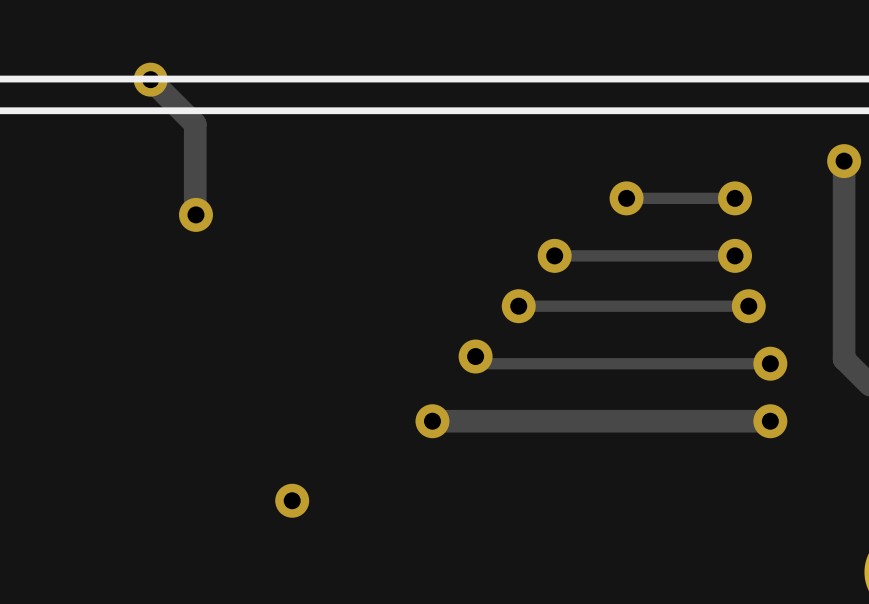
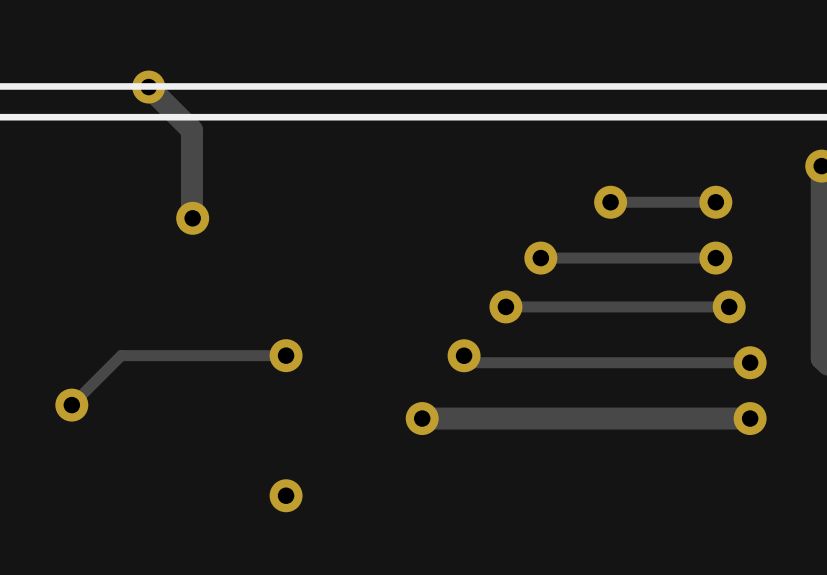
track: none -> (286, 355) (121, 355) (71, 405)
via: none -> (286, 355)
via: none -> (71, 405)

